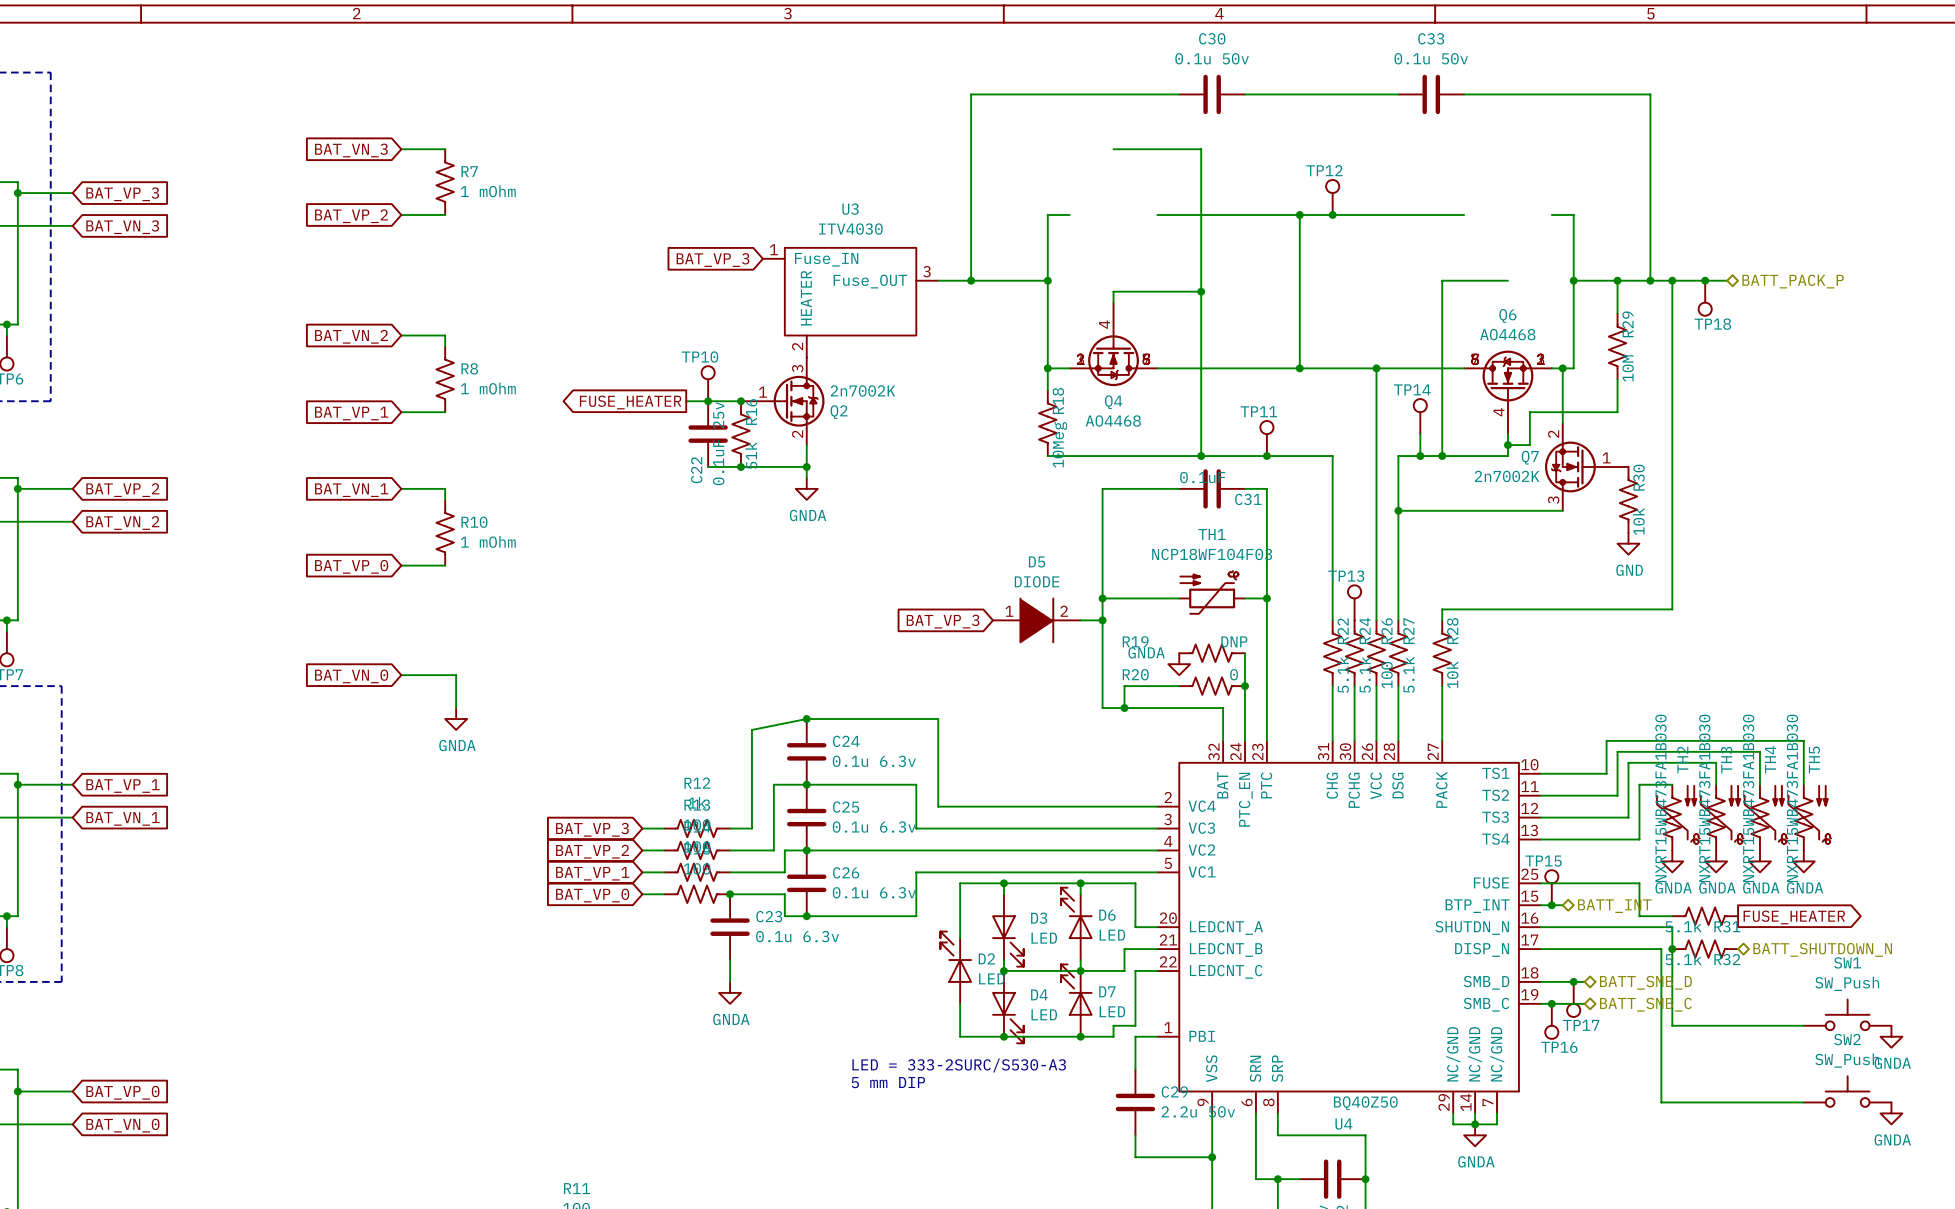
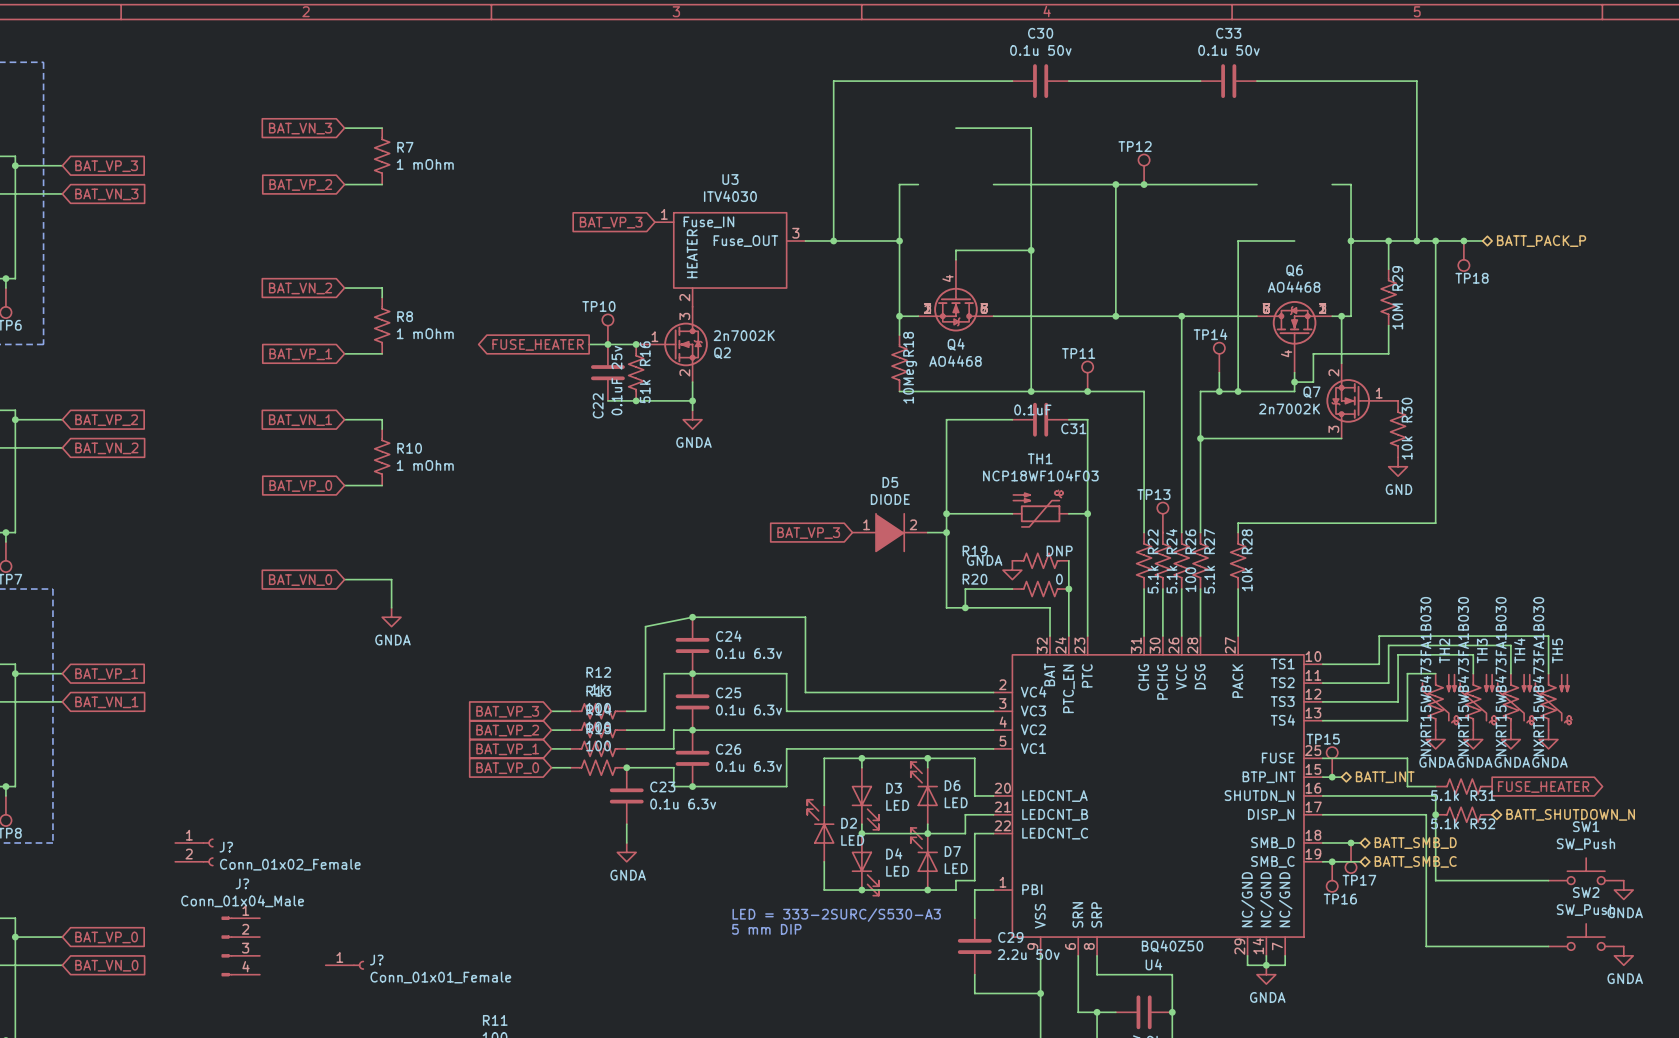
J?: none -> Conn_01x02_Female (194, 852)
J?: none -> Conn_01x04_Male (240, 946)
J?: none -> Conn_01x01_Female (344, 965)

